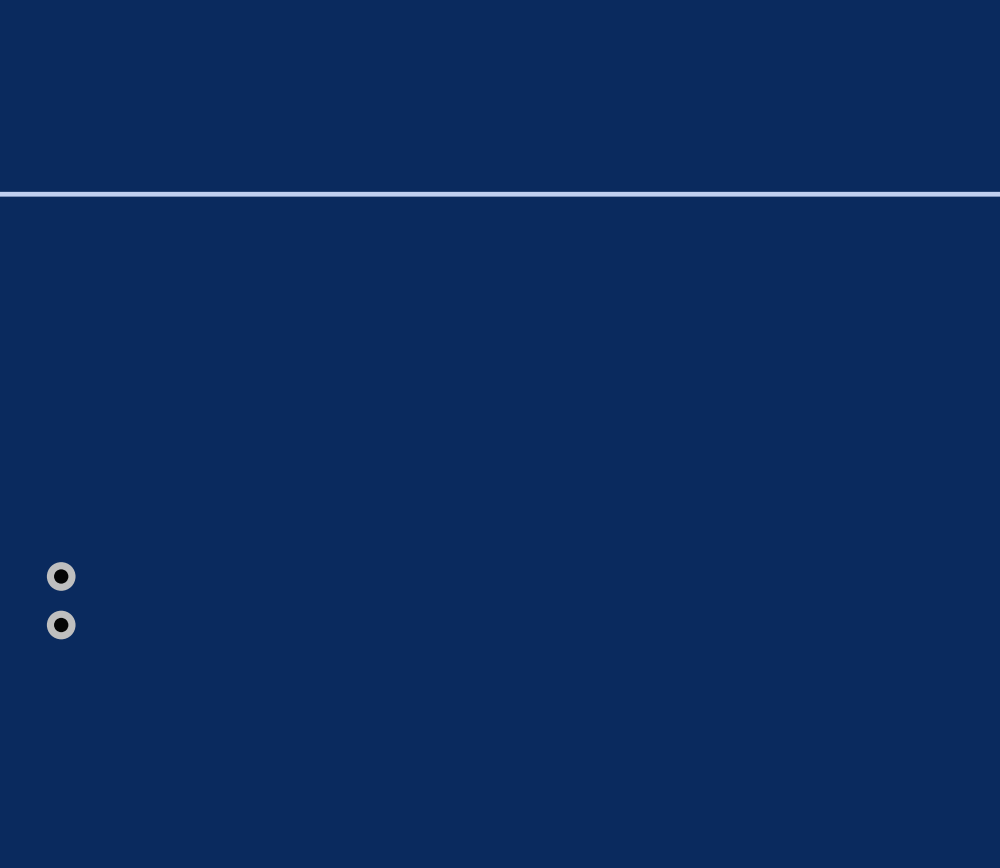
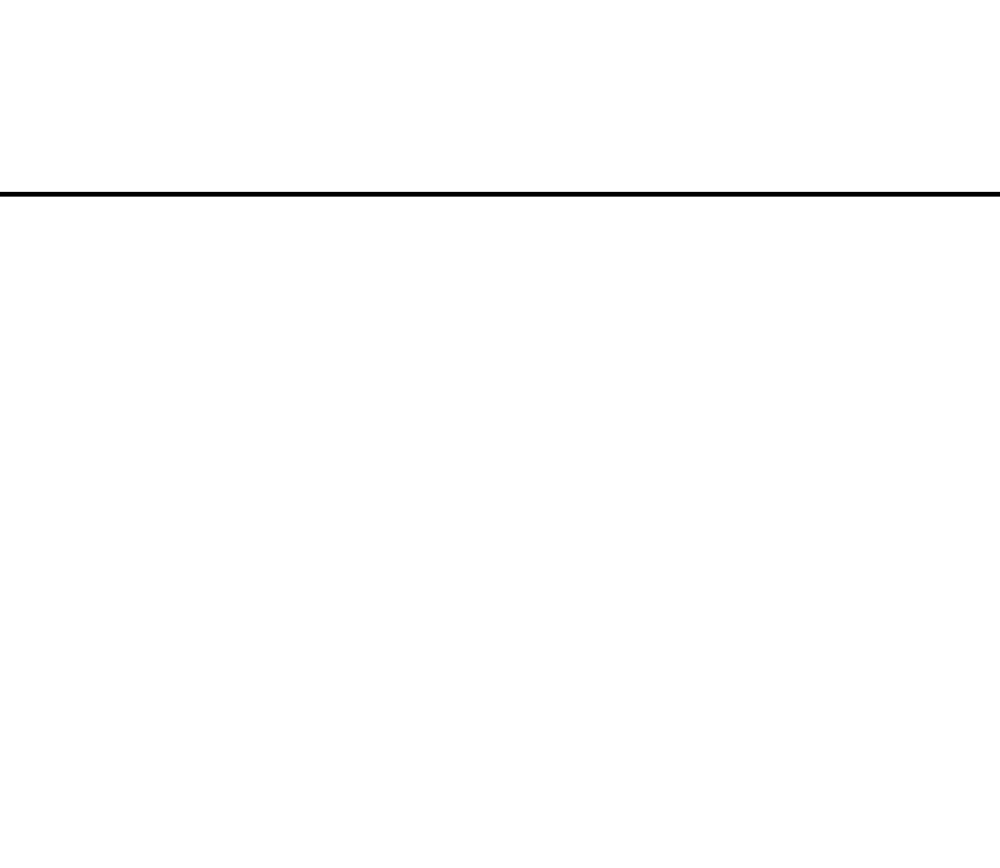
via: (61, 576) -> none
via: (61, 625) -> none

